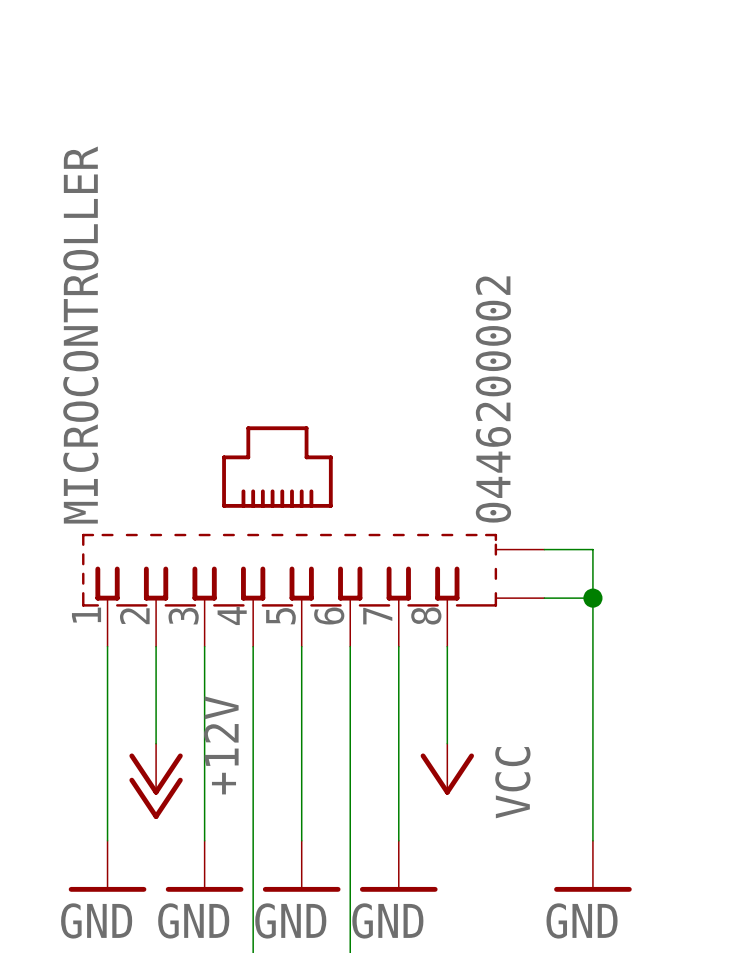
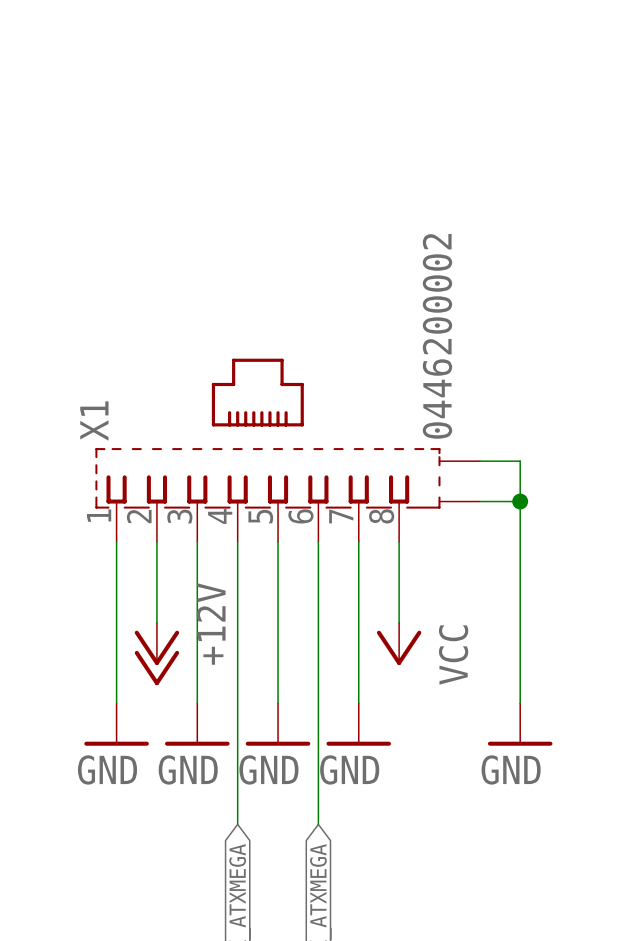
MICROCONTROLLER name: MICROCONTROLLER (80, 335) -> X1 (94, 421)

